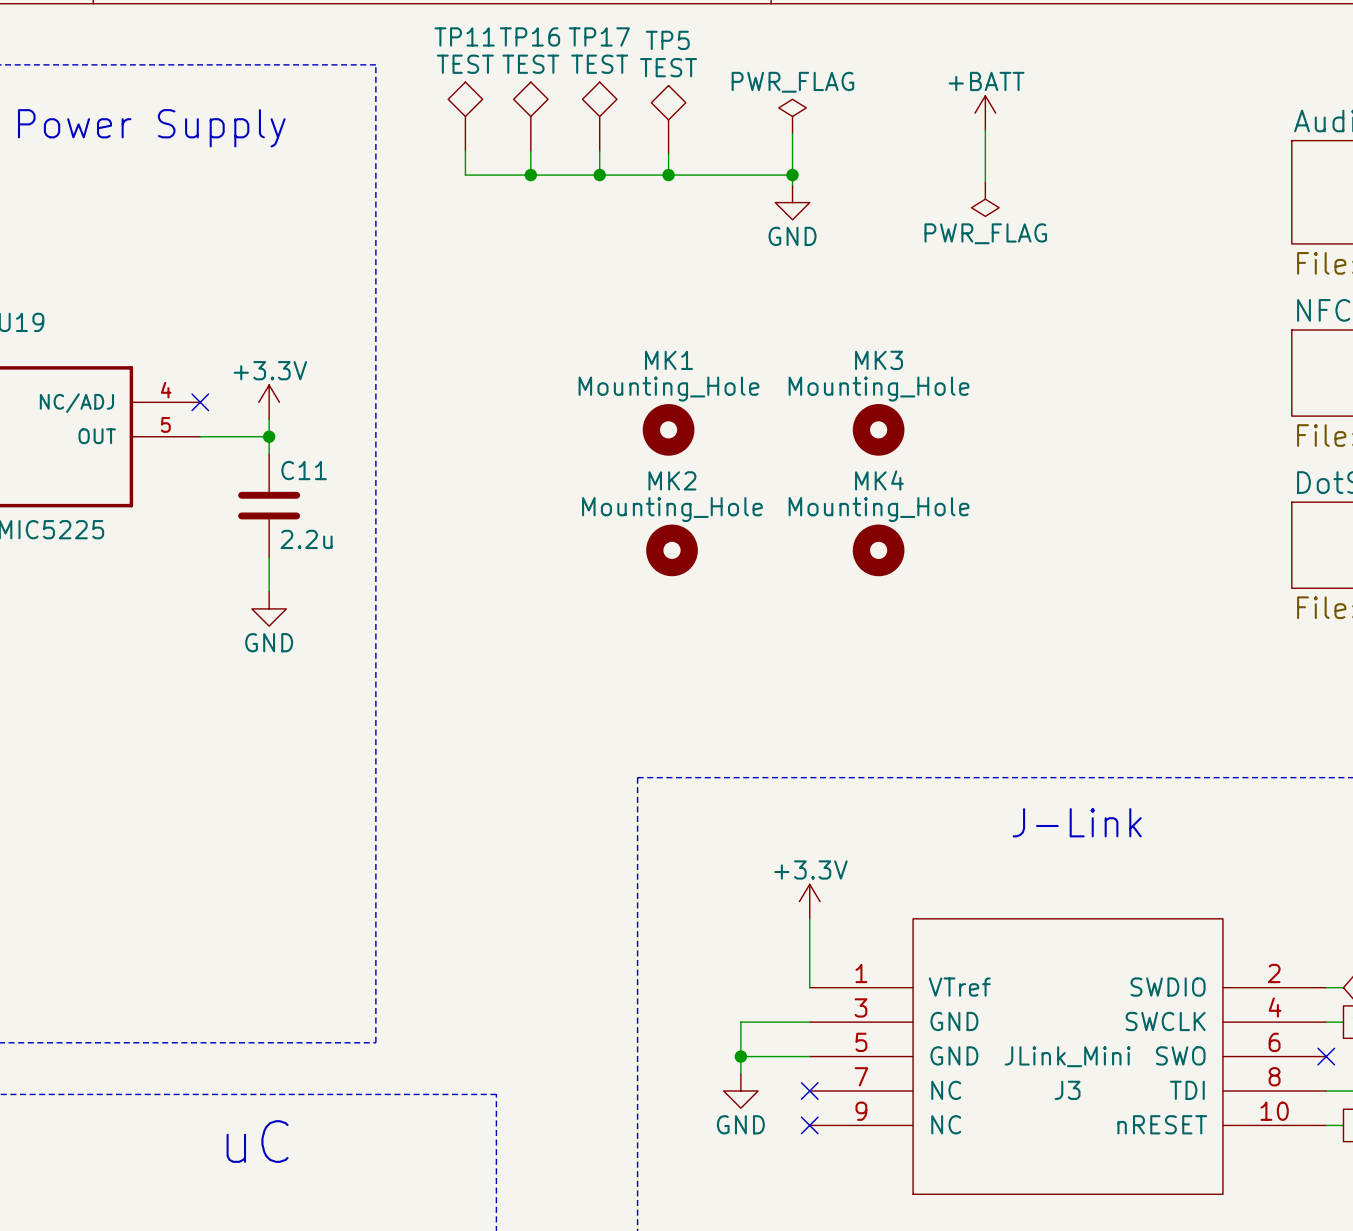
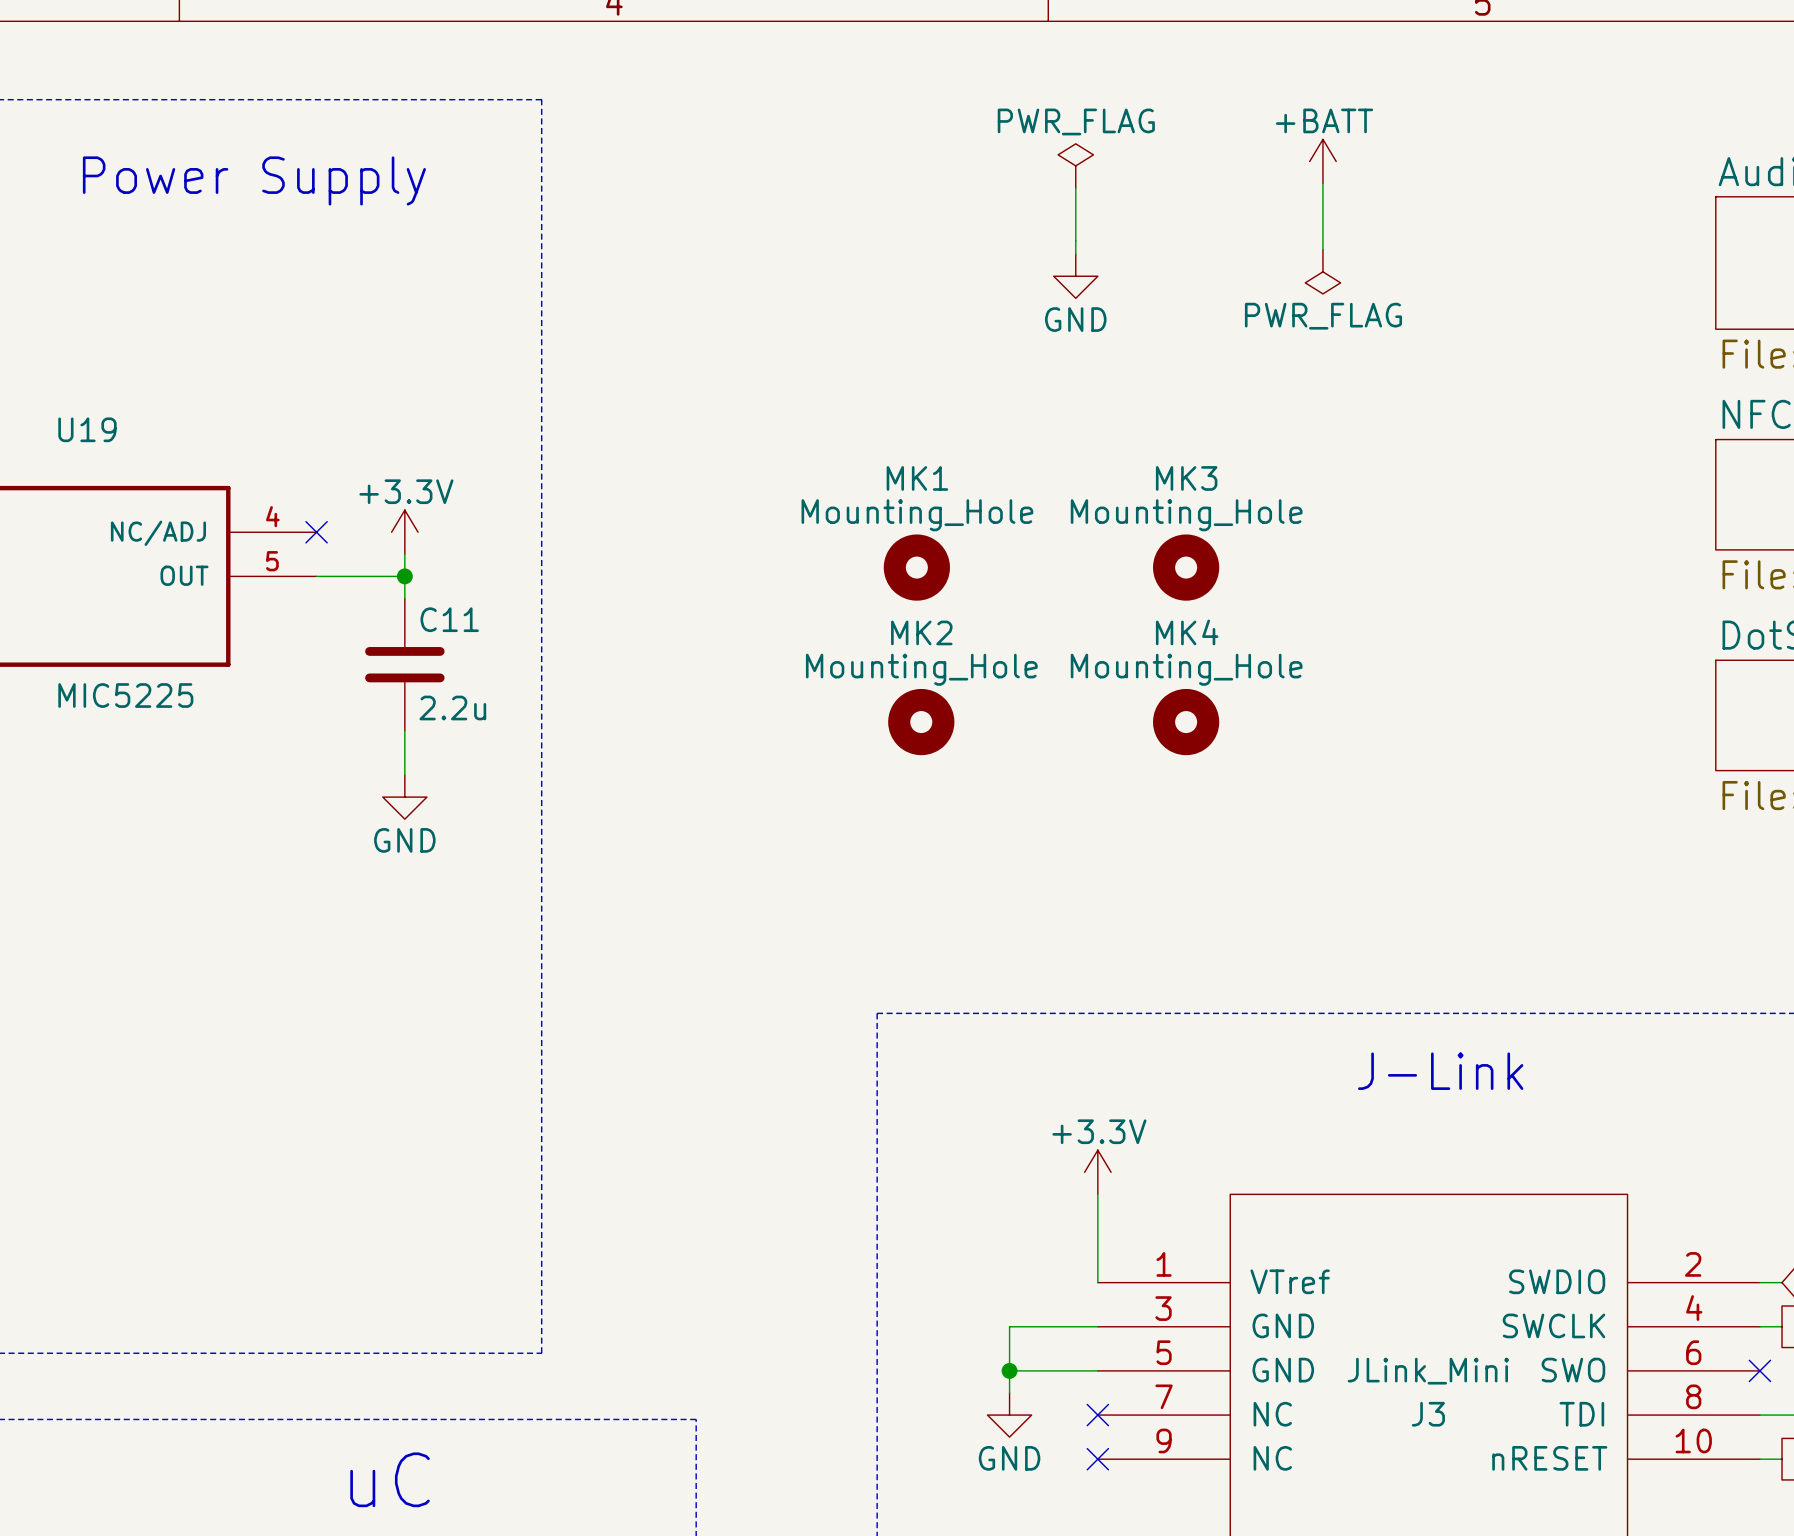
TP11: TEST (465, 116) -> none
TP16: TEST (530, 116) -> none
TP17: TEST (599, 116) -> none
TP5: TEST (668, 119) -> none
wire: (465, 150) (465, 175) (792, 175) -> none
wire: (530, 150) (530, 175) -> none
wire: (599, 150) (599, 175) -> none
wire: (668, 154) (668, 175) -> none
junction: (530, 175) -> none
junction: (599, 175) -> none
junction: (668, 175) -> none
junction: (792, 175) -> none

